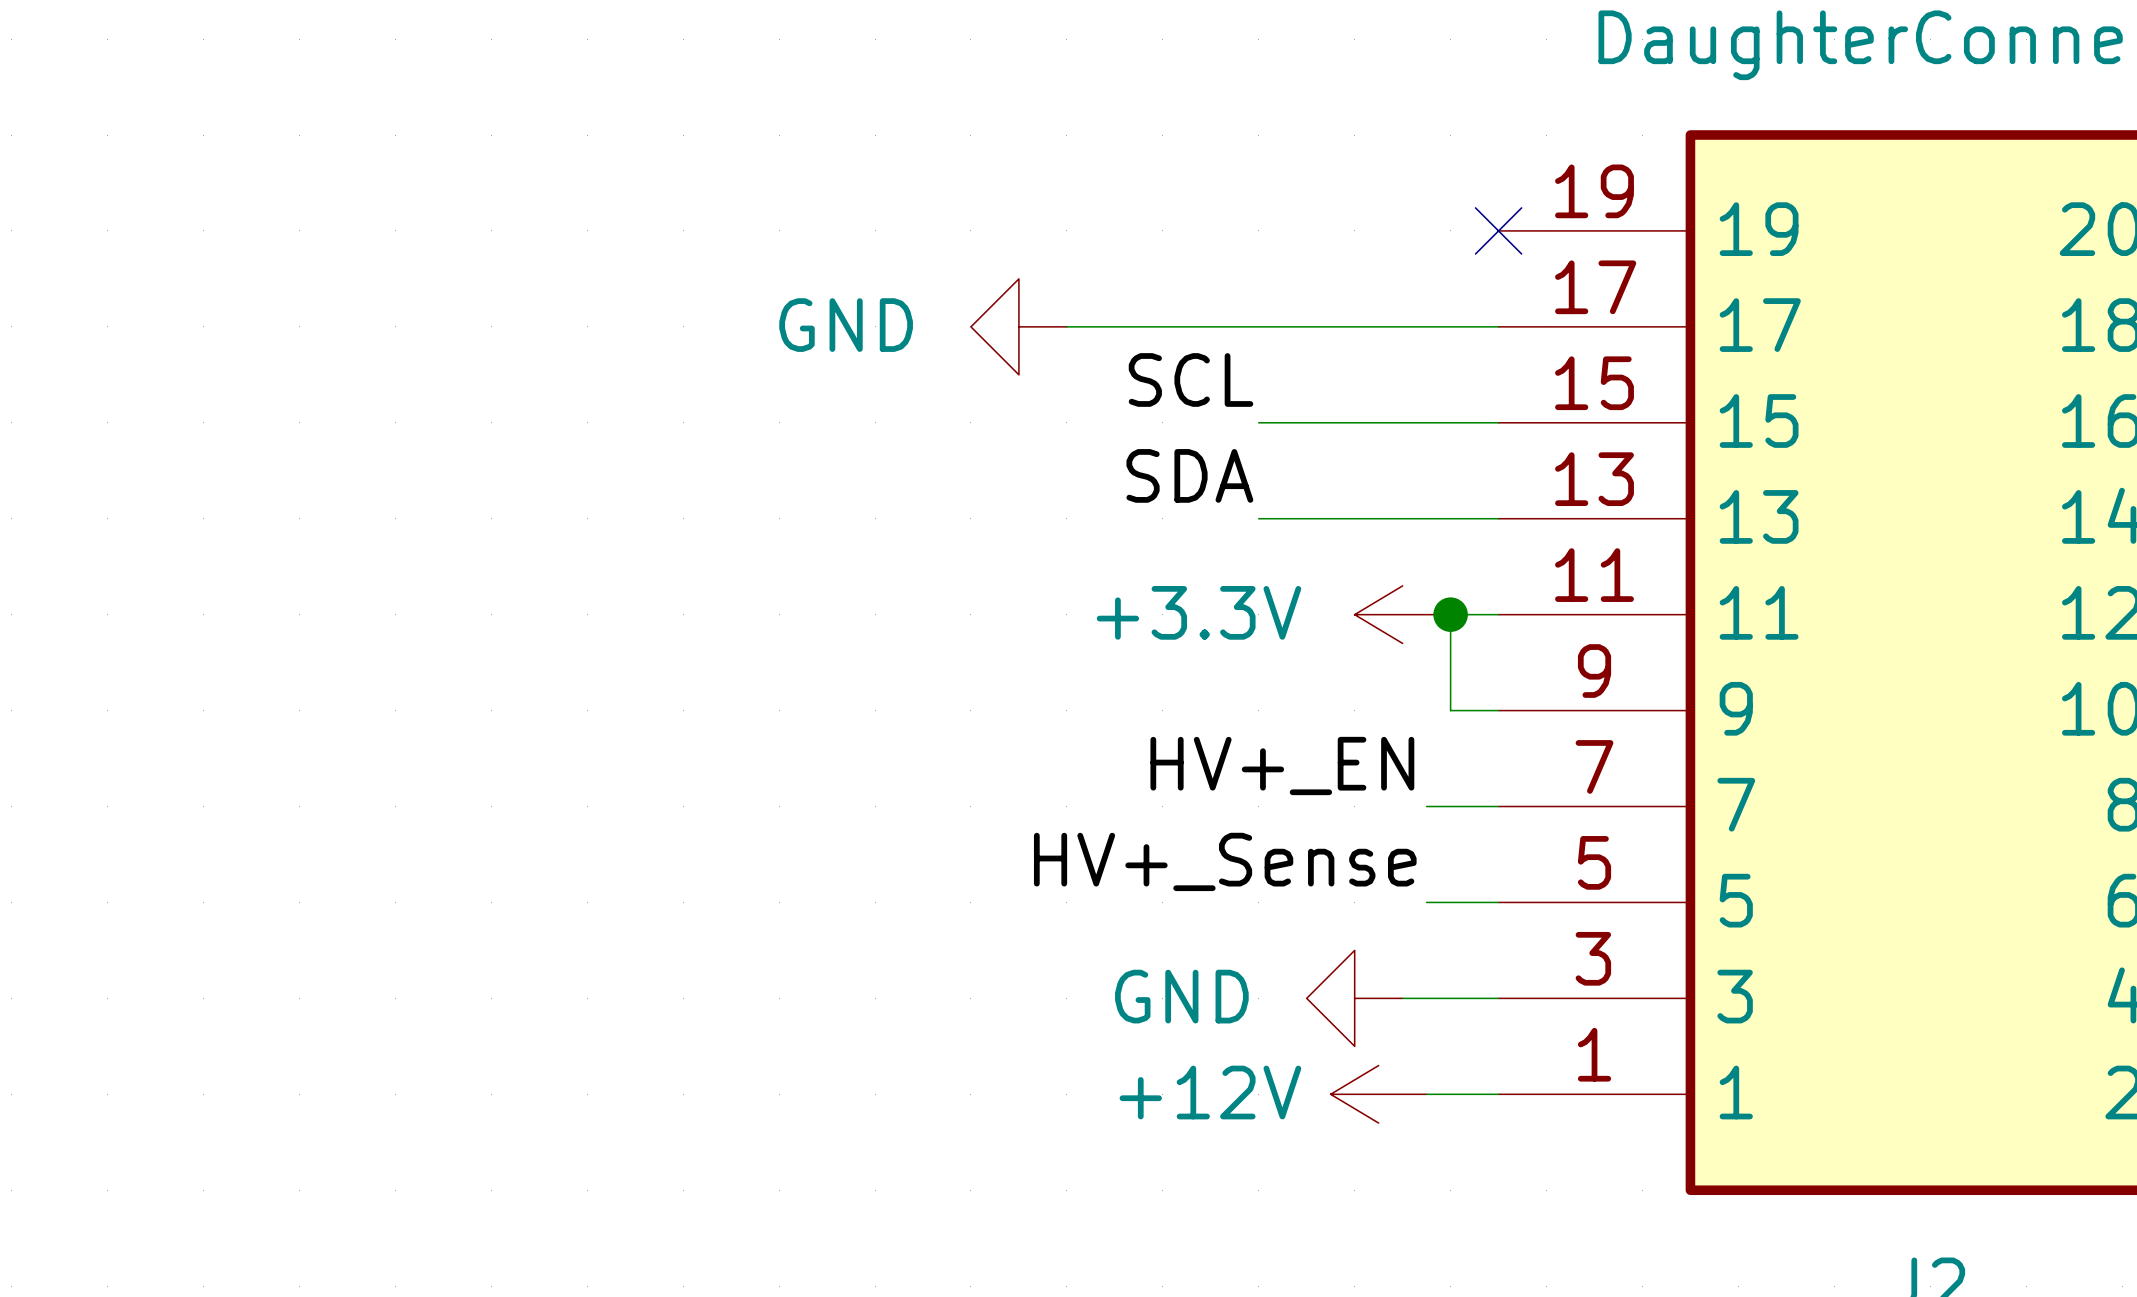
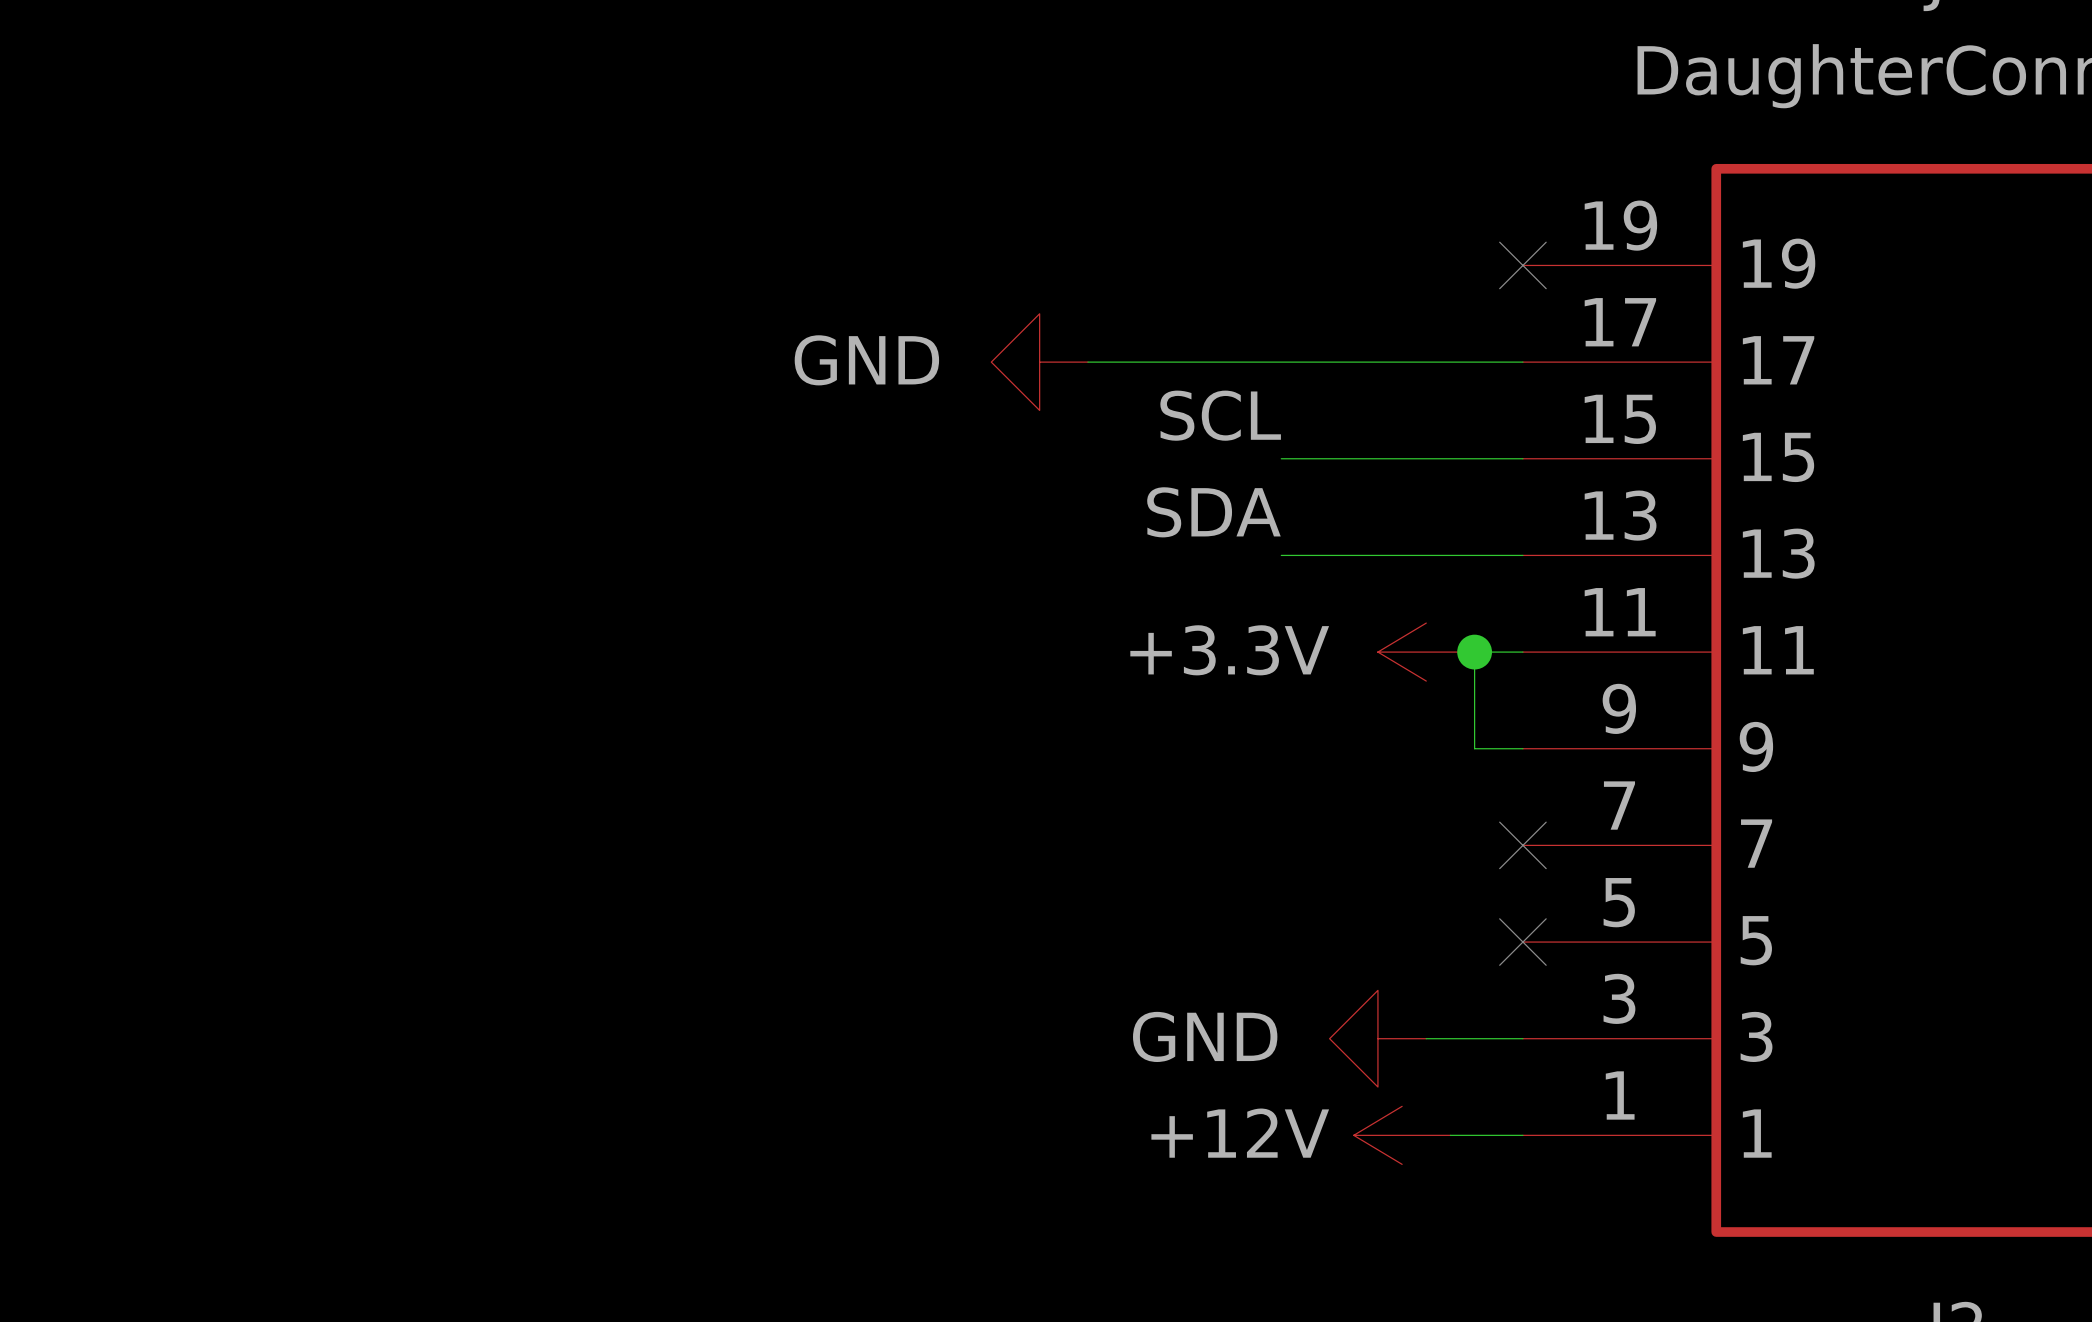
label: HV+_EN (1282, 766) -> none
wire: (1426, 806) (1498, 806) -> none
no-connect mark: none -> (1522, 845)
label: HV+_Sense (1225, 861) -> none
wire: (1426, 902) (1498, 902) -> none
no-connect mark: none -> (1522, 942)

